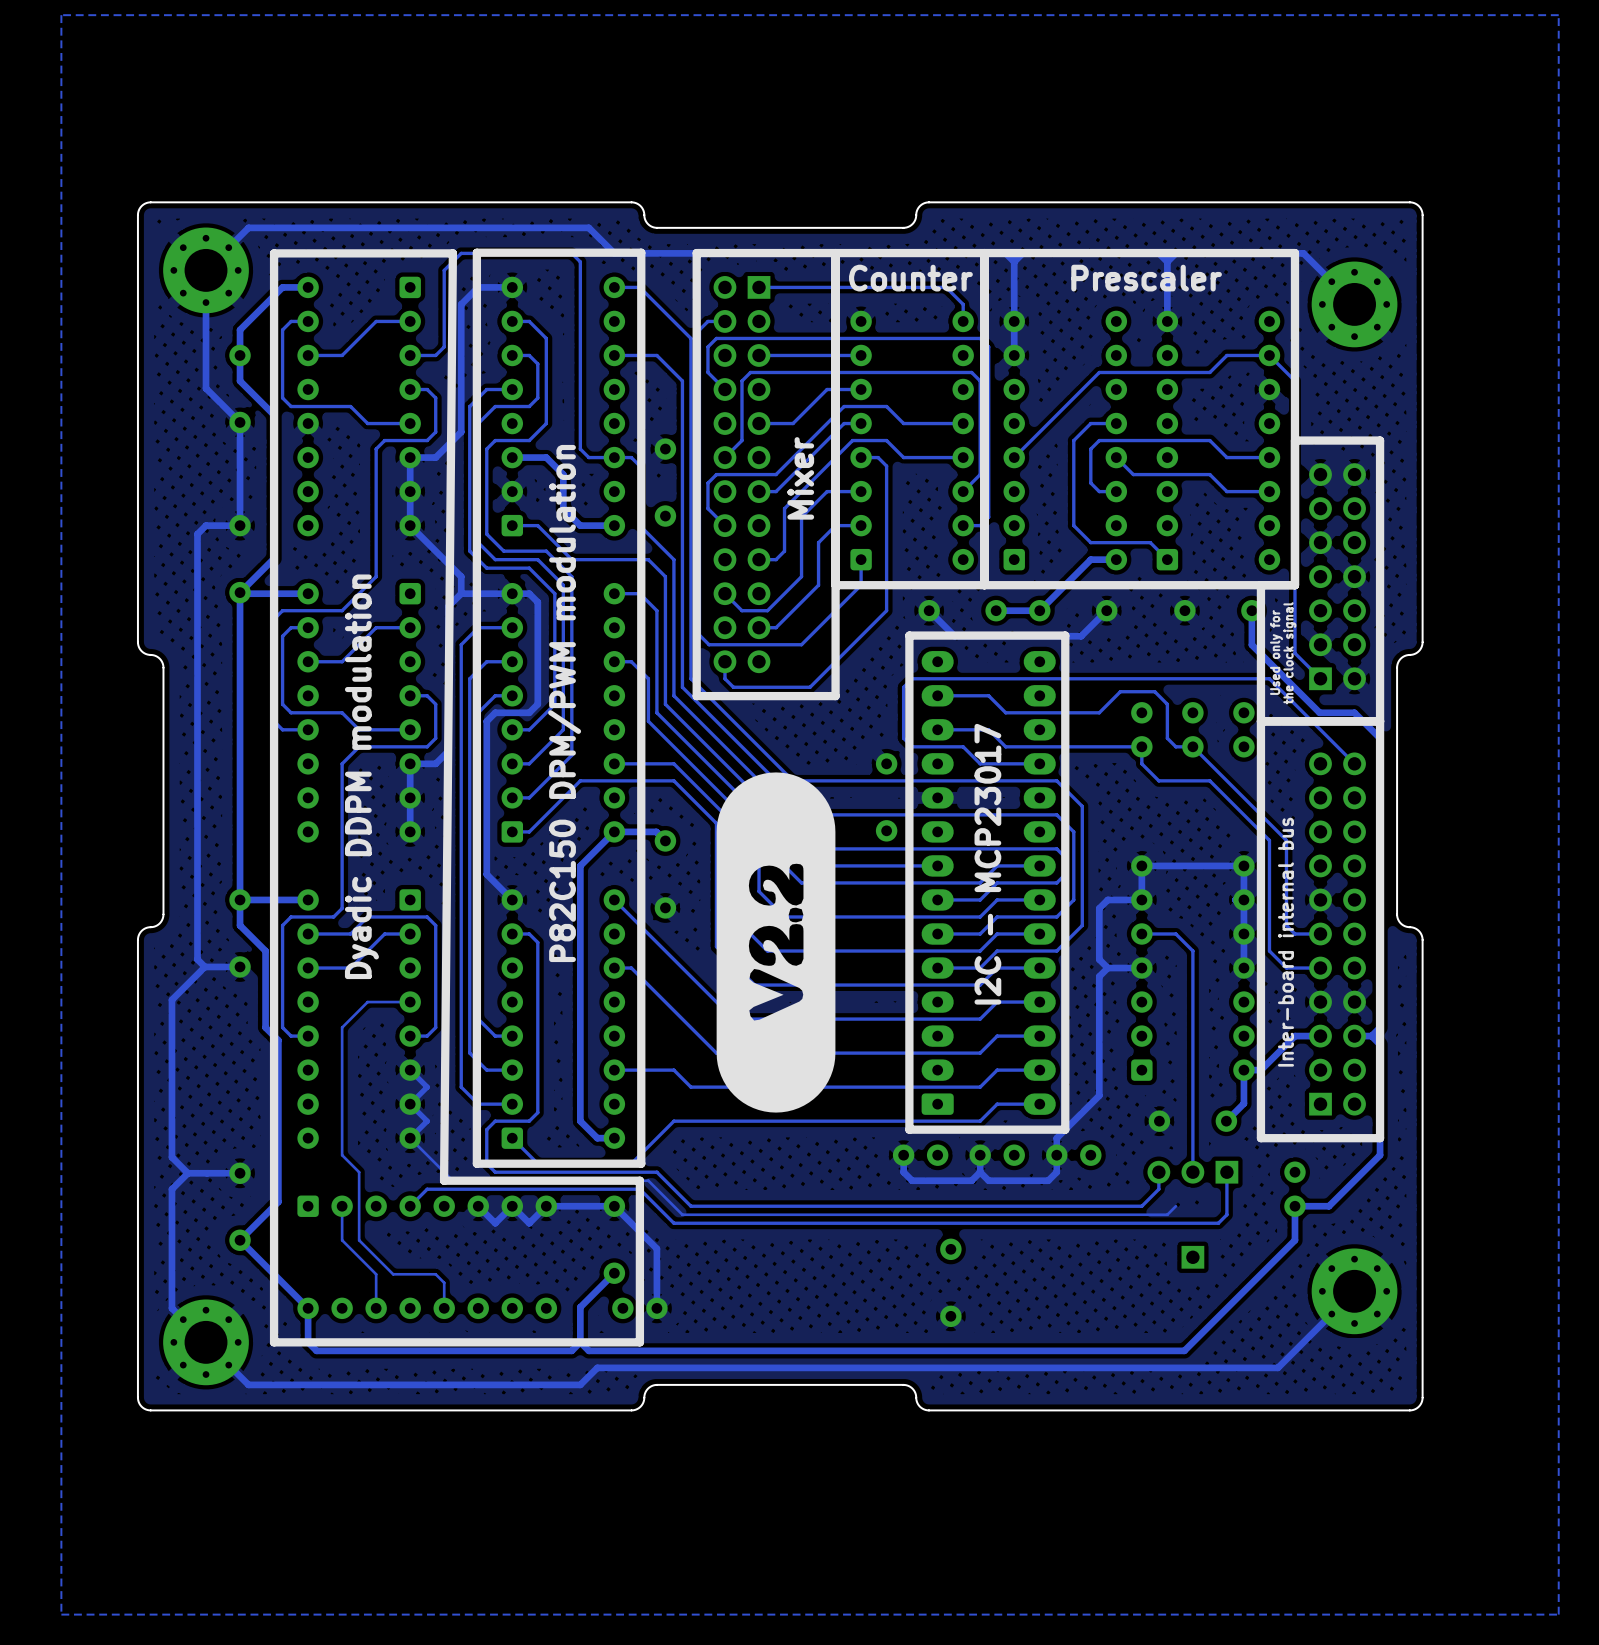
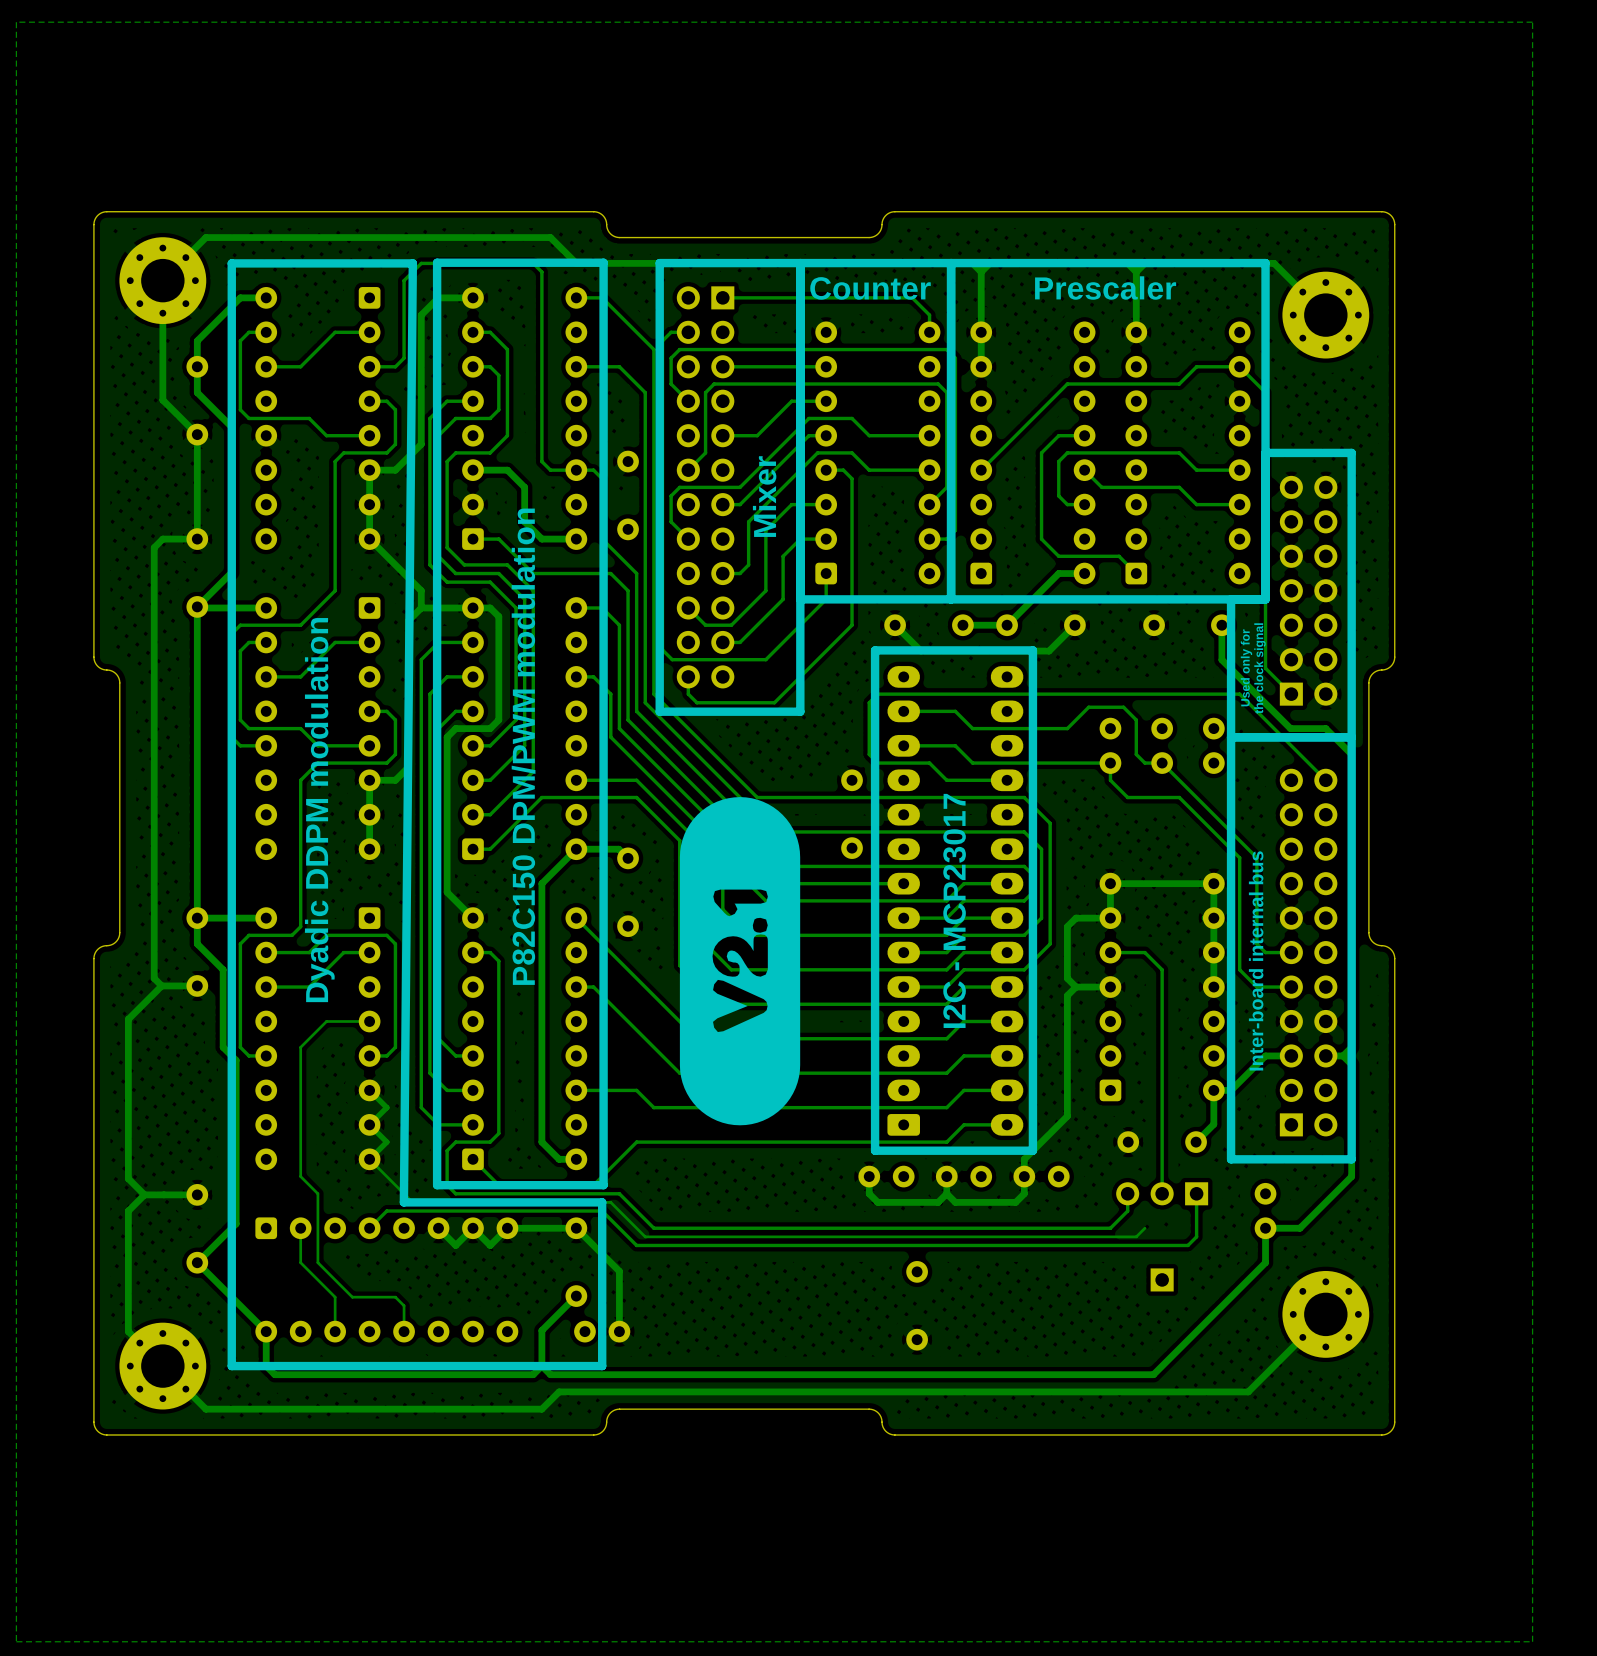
drawing shape: [716, 772, 836, 1113] -> [679, 797, 801, 1126]

